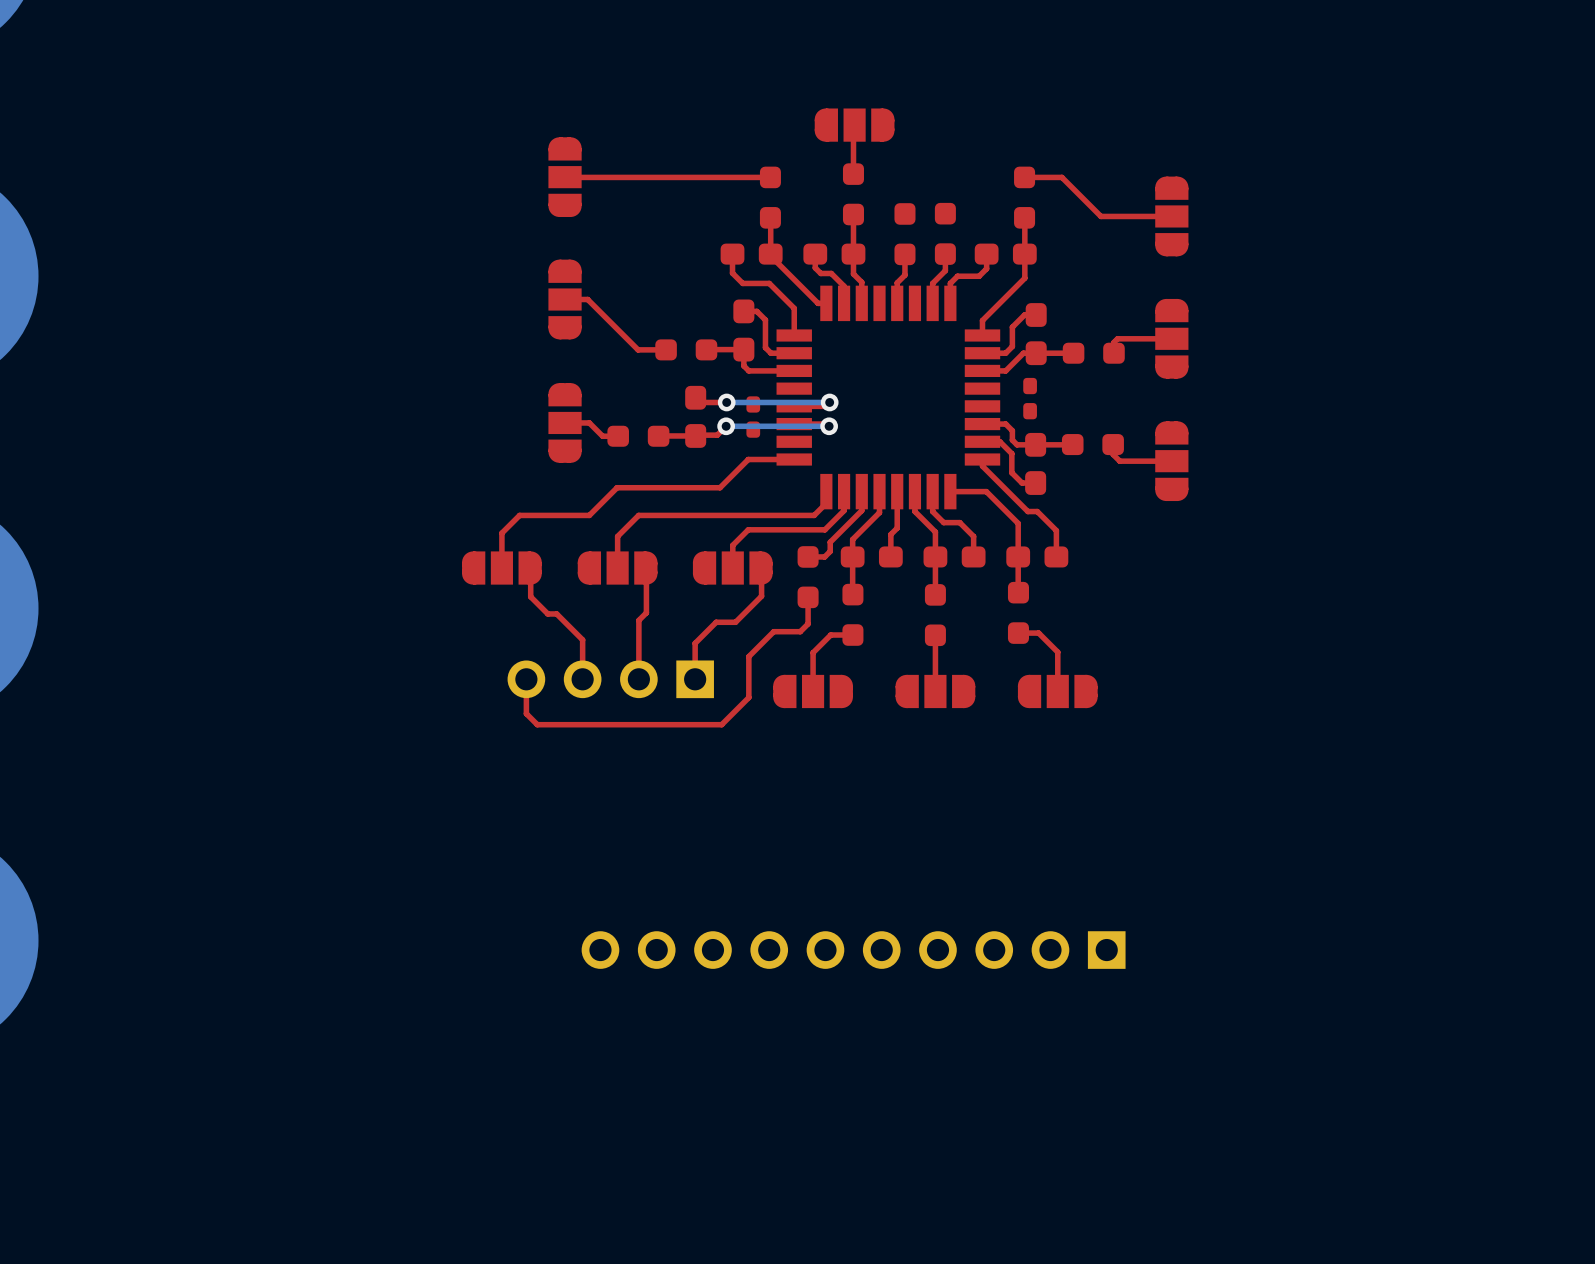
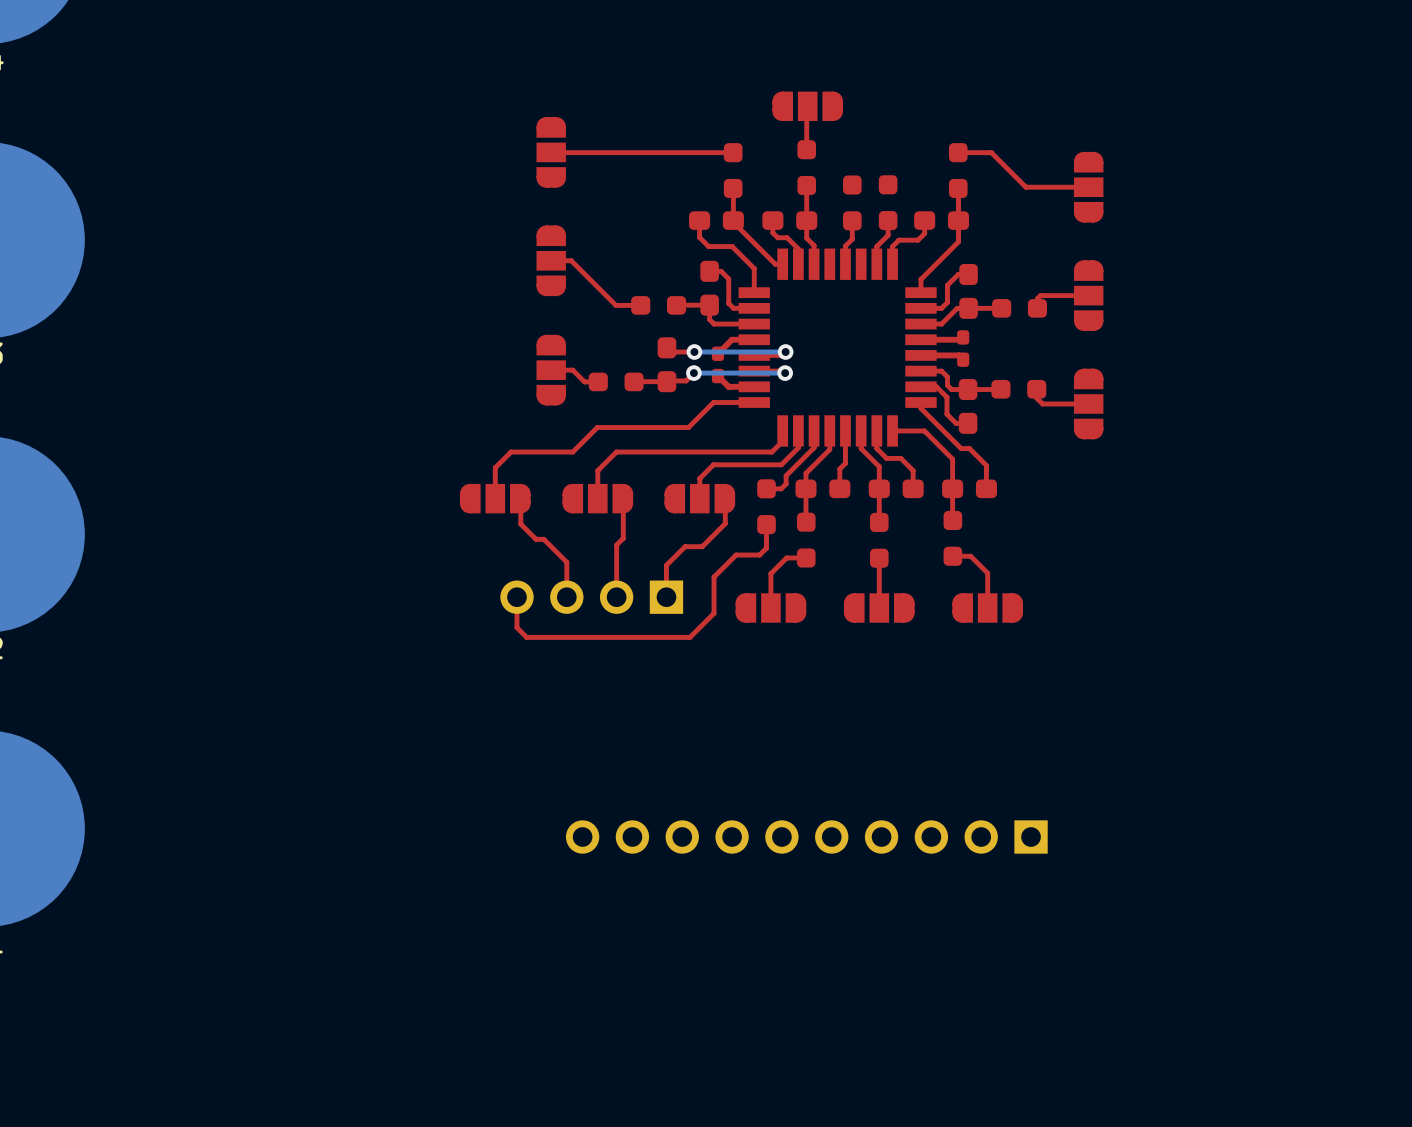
top track: none -> (963, 337) (960, 339) (920, 339)
top track: none -> (754, 339) (731, 339) (717, 353)
top track: none -> (920, 355) (958, 355) (963, 359)
top track: none -> (717, 376) (728, 386) (754, 386)

